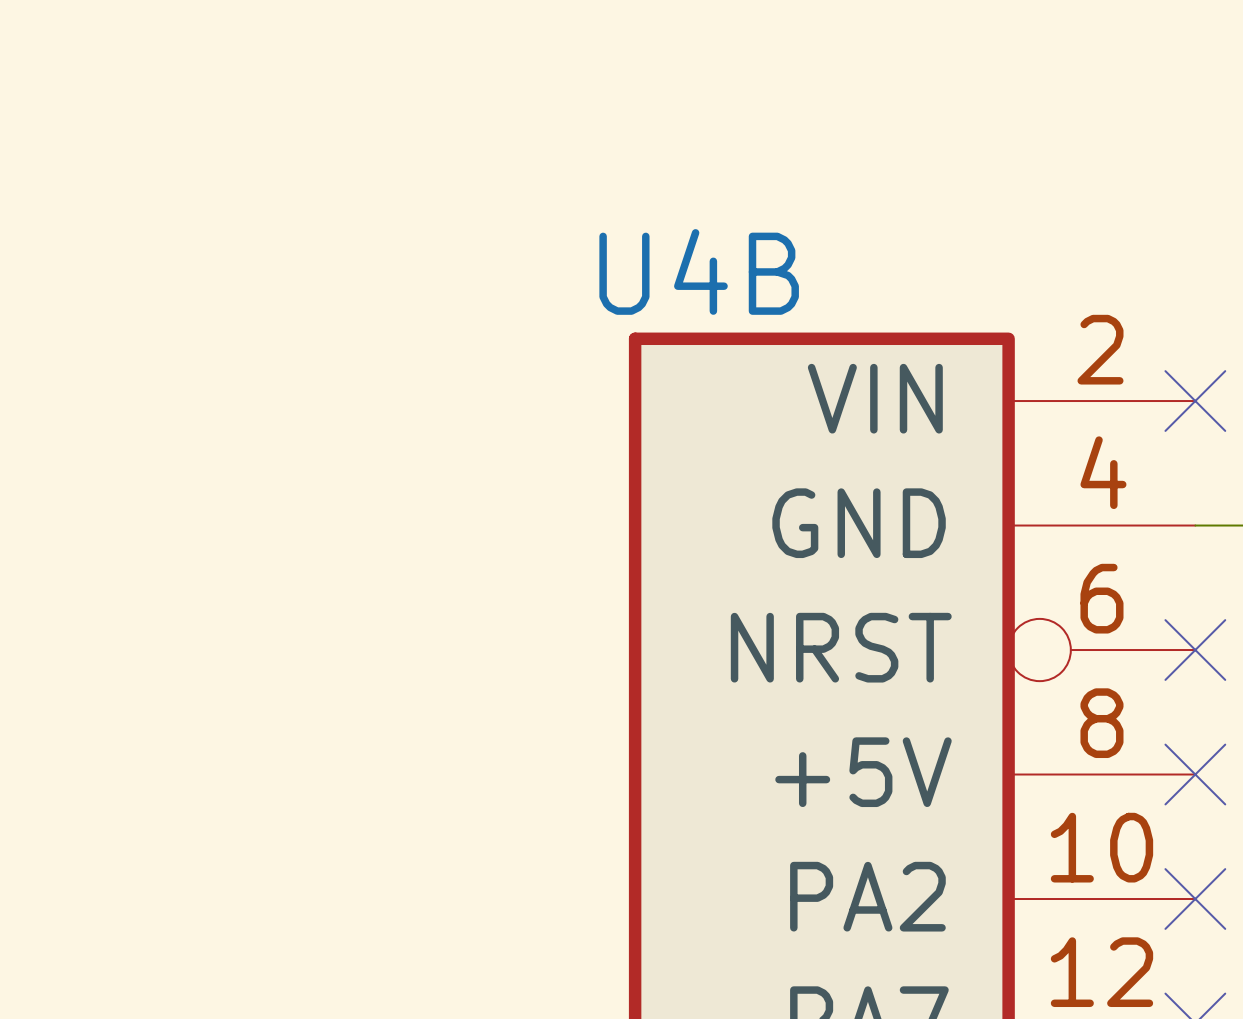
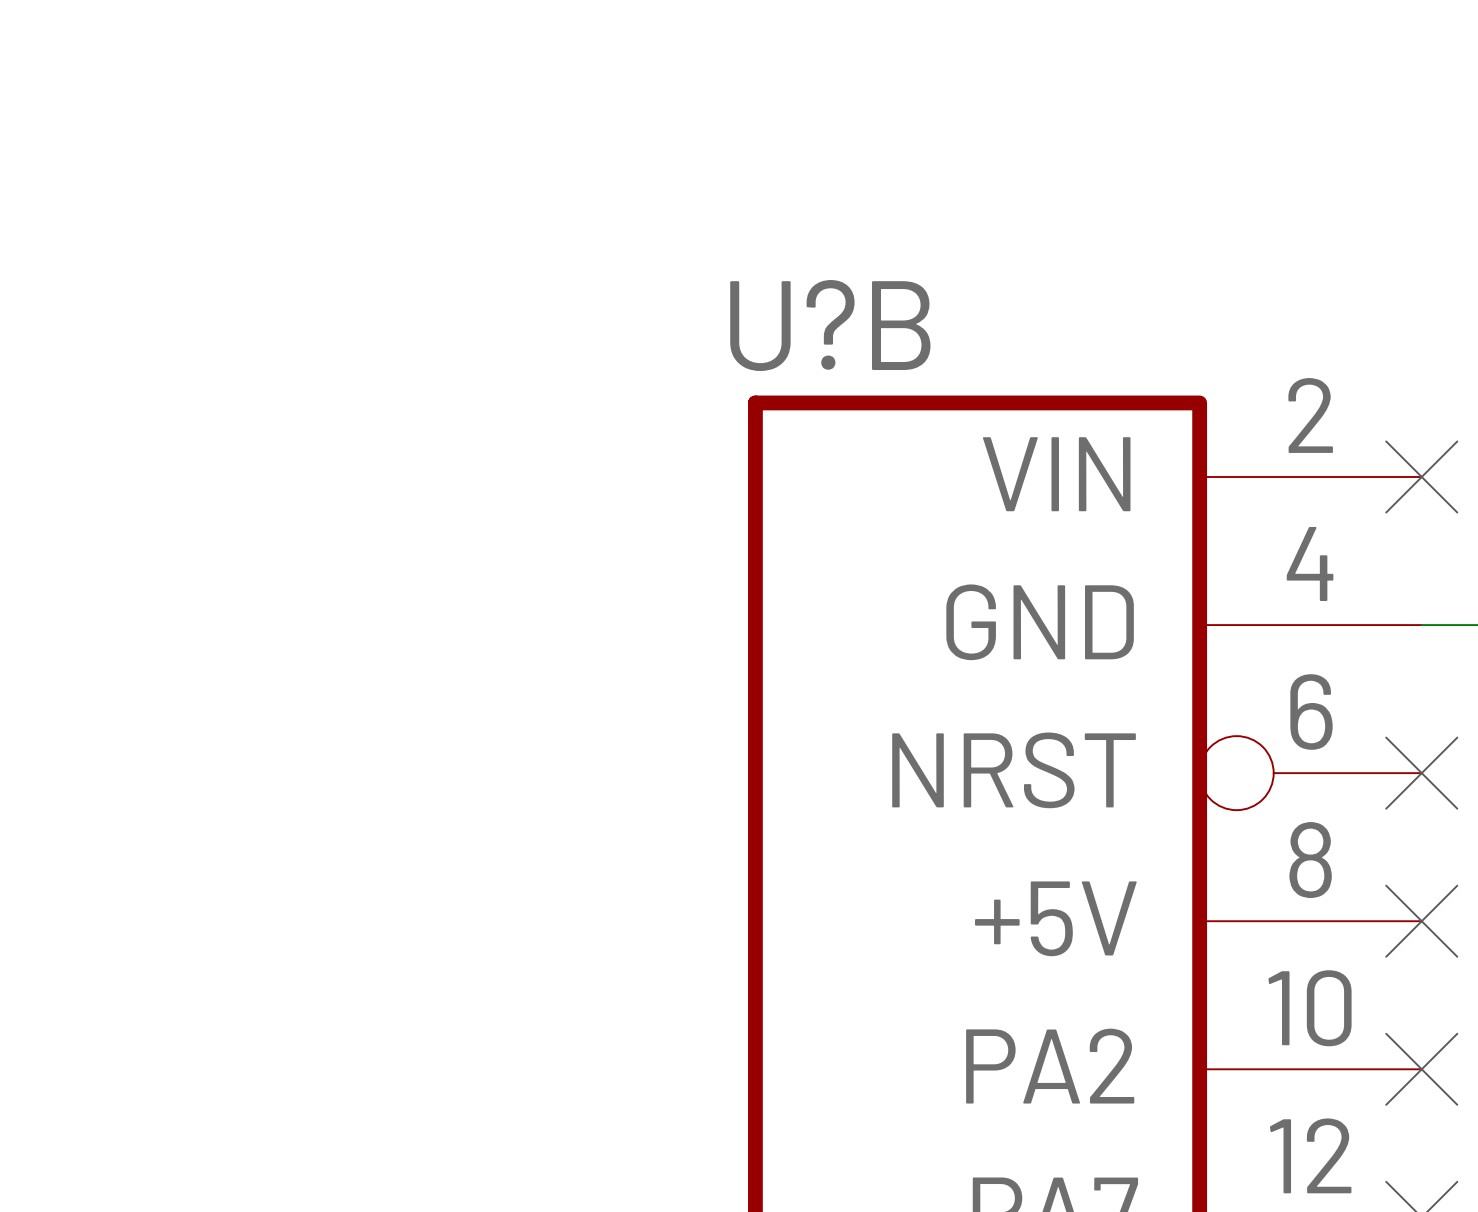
U4B name: U4B (699, 271) -> U?B (830, 325)

